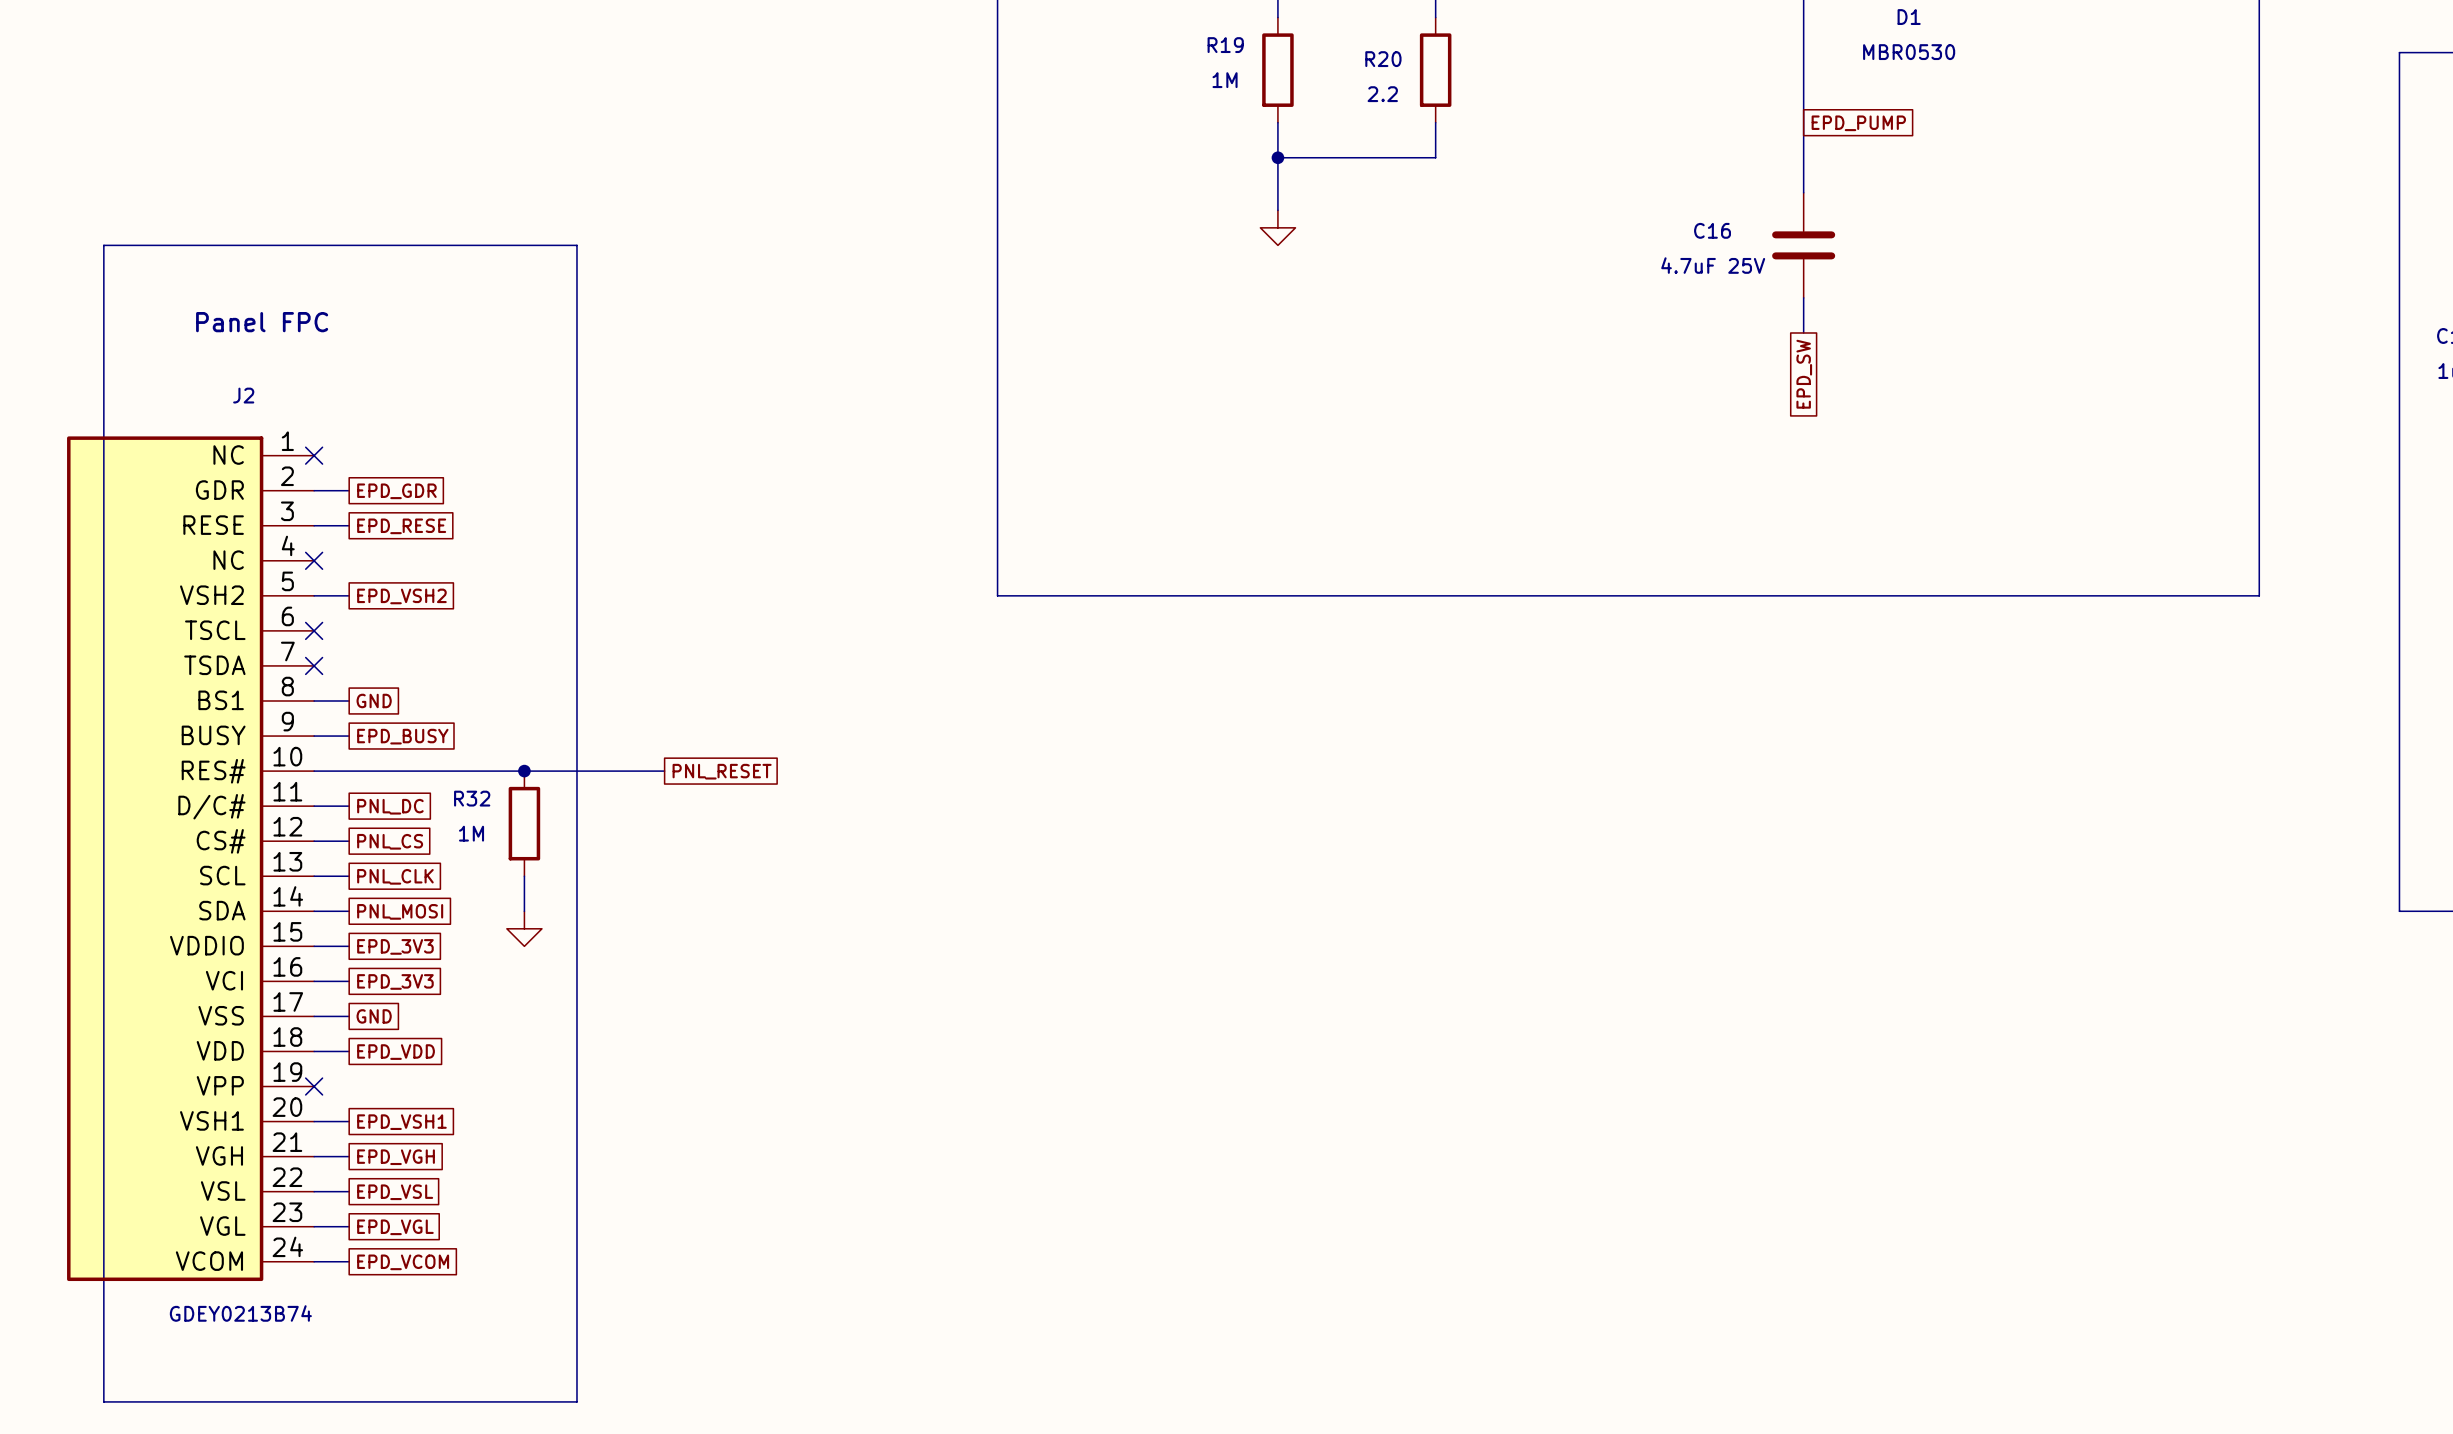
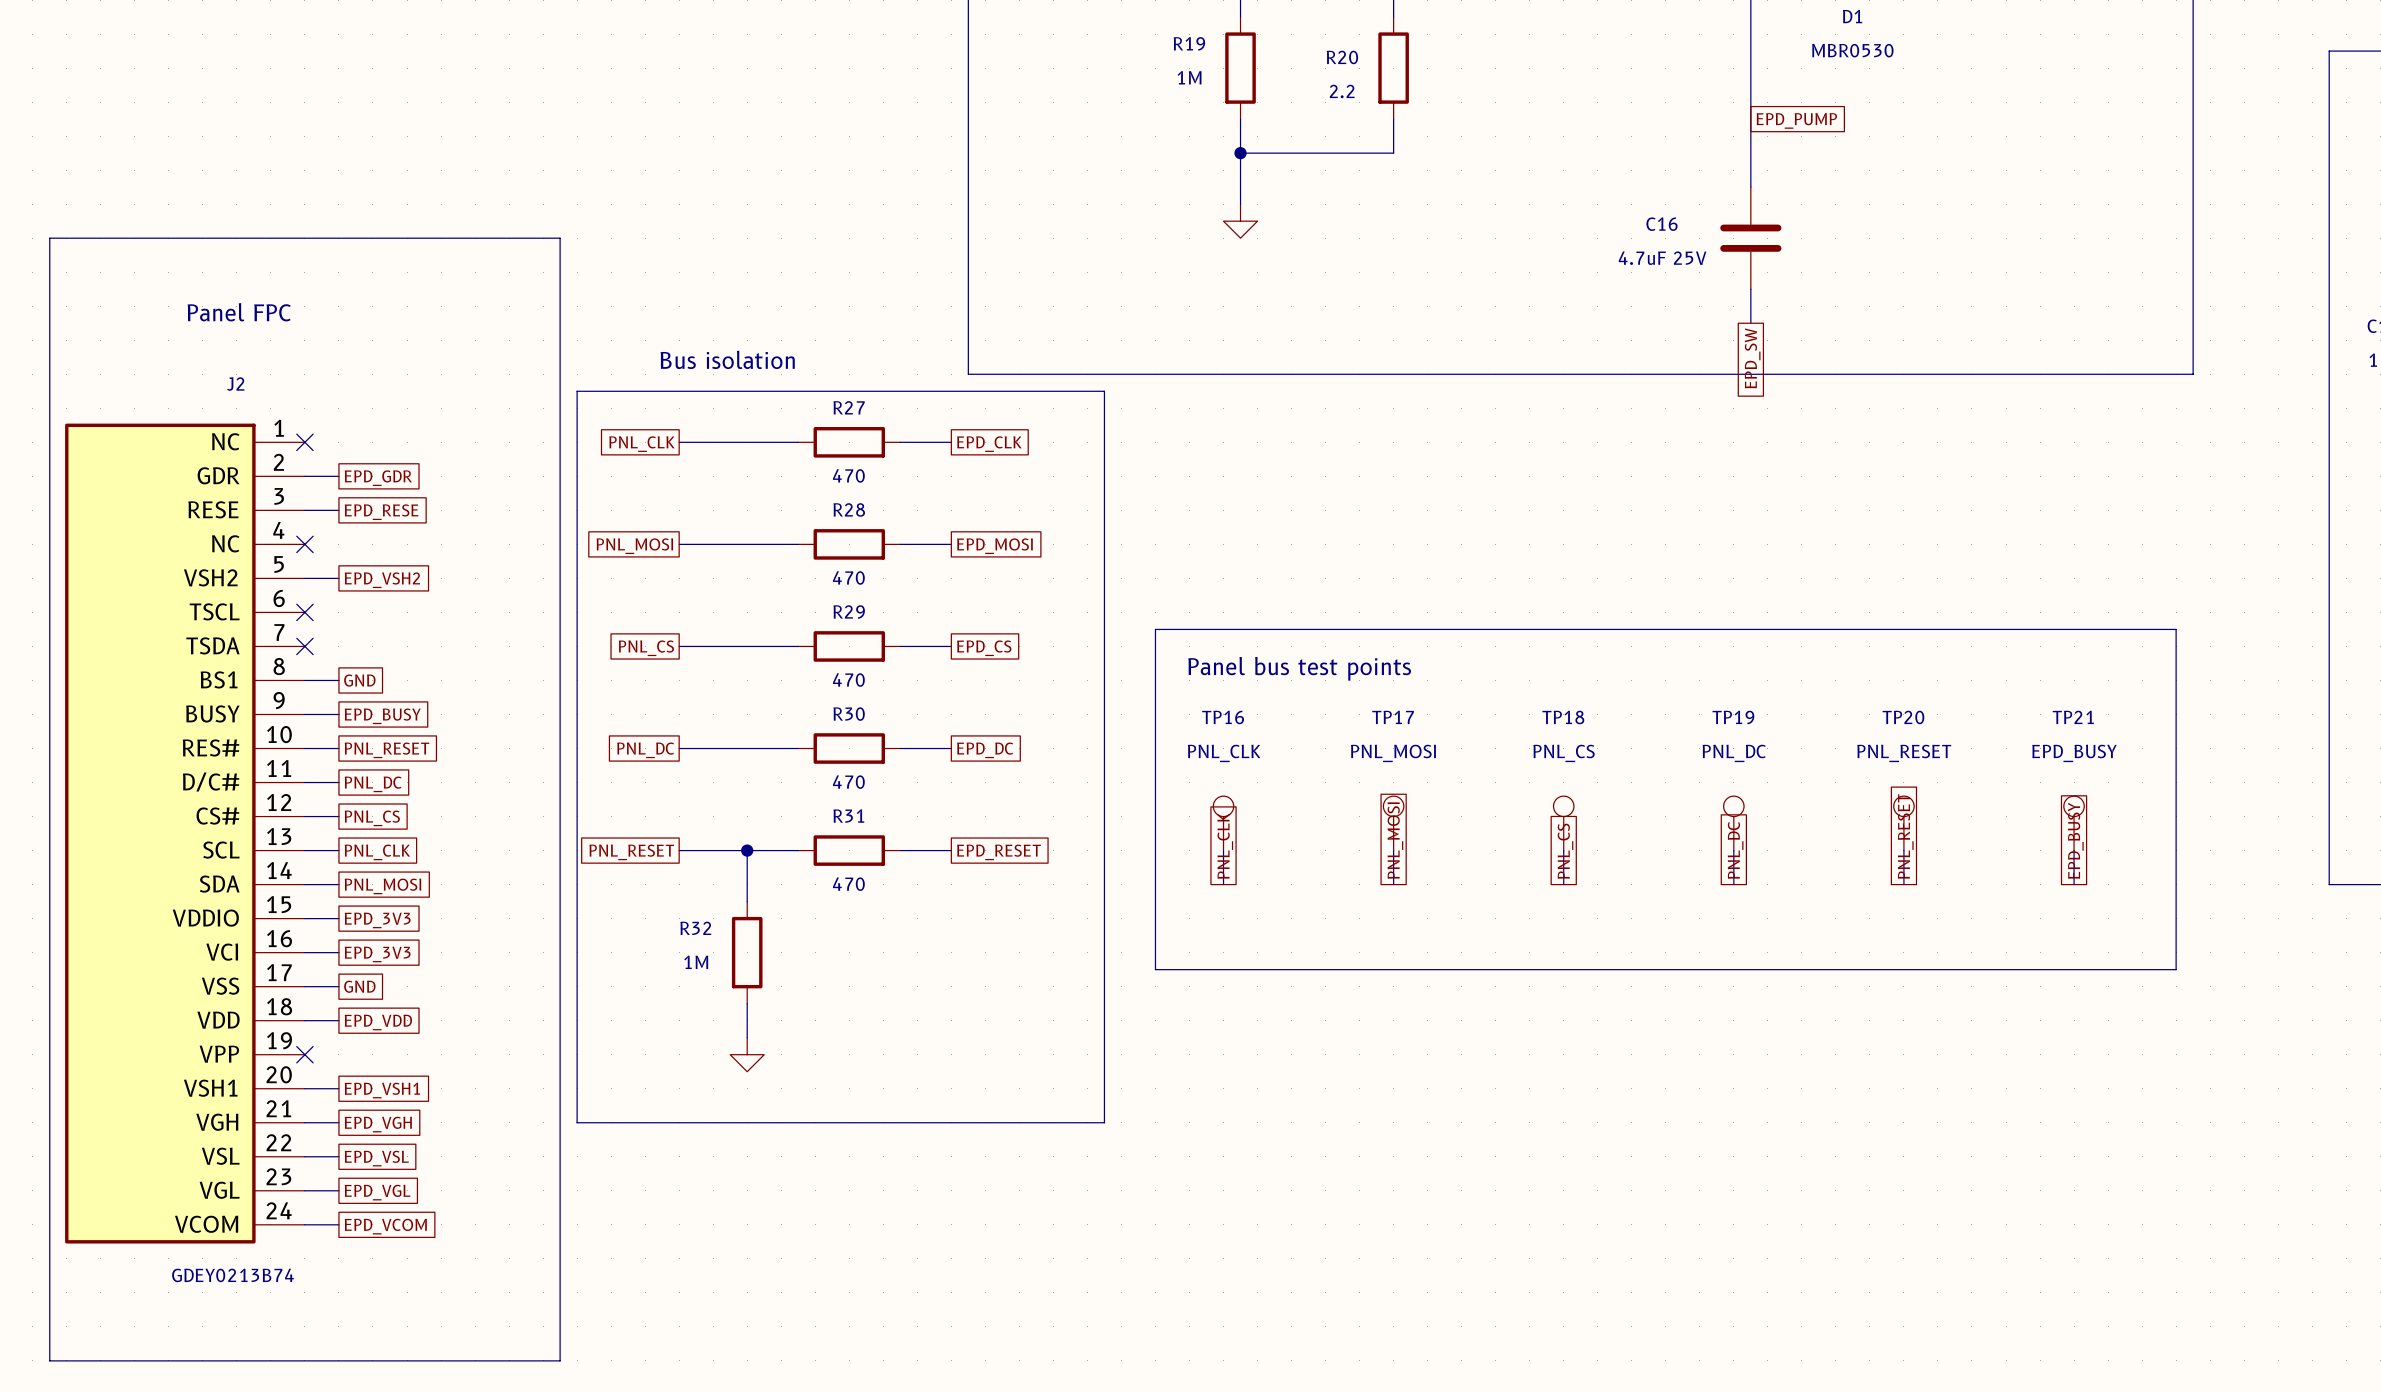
line: (103, 245) (103, 1401) -> (100, 238) (49, 238) (49, 1360) (100, 1360)
text: none -> Bus isolation (727, 359)
line: (997, 385) (997, 595) (2259, 595) (2259, 385) -> (968, 374) (2193, 374)
line: none -> (577, 391) (1104, 391) (1104, 1122) (577, 1122) (577, 391)
wire: none -> (679, 442) (798, 442)
R27: none -> 470 (849, 442)
wire: none -> (900, 442) (951, 442)
global label: none -> PNL_CLK (641, 444)
global label: none -> EPD_CLK (989, 444)
wire: none -> (679, 544) (798, 544)
R28: none -> 470 (849, 544)
wire: none -> (900, 544) (951, 544)
global label: none -> PNL_MOSI (634, 546)
global label: none -> EPD_MOSI (994, 546)
line: none -> (1155, 629) (2176, 629) (2176, 969) (1155, 969) (1155, 629)
wire: none -> (679, 646) (798, 646)
R29: none -> 470 (849, 646)
wire: none -> (900, 646) (951, 646)
global label: none -> PNL_CS (646, 648)
global label: none -> EPD_CS (984, 648)
text: none -> Panel bus test points (1299, 668)
wire: (349, 771) (664, 771) -> none
global label: none -> PNL_RESET (386, 750)
junction: (524, 771) -> none
global label: none -> PNL_DC (645, 750)
wire: none -> (679, 748) (798, 748)
global label rotation: 0° (722, 771) -> 180° (631, 852)
global label position: PNL_RESET (722, 771) -> PNL_RESET (631, 852)
R30: none -> 470 (849, 748)
wire: none -> (900, 748) (951, 748)
global label: none -> EPD_DC (985, 750)
R32 position: (524, 823) -> (747, 952)
TP16: none -> PNL_CLK (1223, 823)
TP17: none -> PNL_MOSI (1393, 823)
TP18: none -> PNL_CS (1563, 823)
TP19: none -> PNL_DC (1733, 823)
TP20: none -> PNL_RESET (1903, 823)
TP21: none -> EPD_BUSY (2074, 823)
global label: none -> PNL_RESET (1905, 836)
global label: none -> EPD_BUSY (2075, 840)
global label: none -> PNL_MOSI (1395, 840)
global label: none -> PNL_CLK (1225, 846)
global label: none -> PNL_CS (1565, 851)
global label: none -> PNL_DC (1735, 850)
wire: (524, 876) (524, 911) -> (747, 1003) (747, 1037)
wire: none -> (679, 850) (798, 850)
wire: none -> (747, 850) (747, 901)
junction: none -> (747, 850)
R31: none -> 470 (849, 850)
wire: none -> (900, 850) (951, 850)
global label: none -> EPD_RESET (998, 852)
wire: none -> (1223, 850) (1223, 884)
wire: none -> (1393, 850) (1393, 884)
wire: none -> (1563, 850) (1563, 884)
wire: none -> (1733, 850) (1733, 884)
wire: none -> (1903, 850) (1903, 884)
wire: none -> (2074, 850) (2074, 884)
power symbol position: (524, 928) -> (747, 1054)

